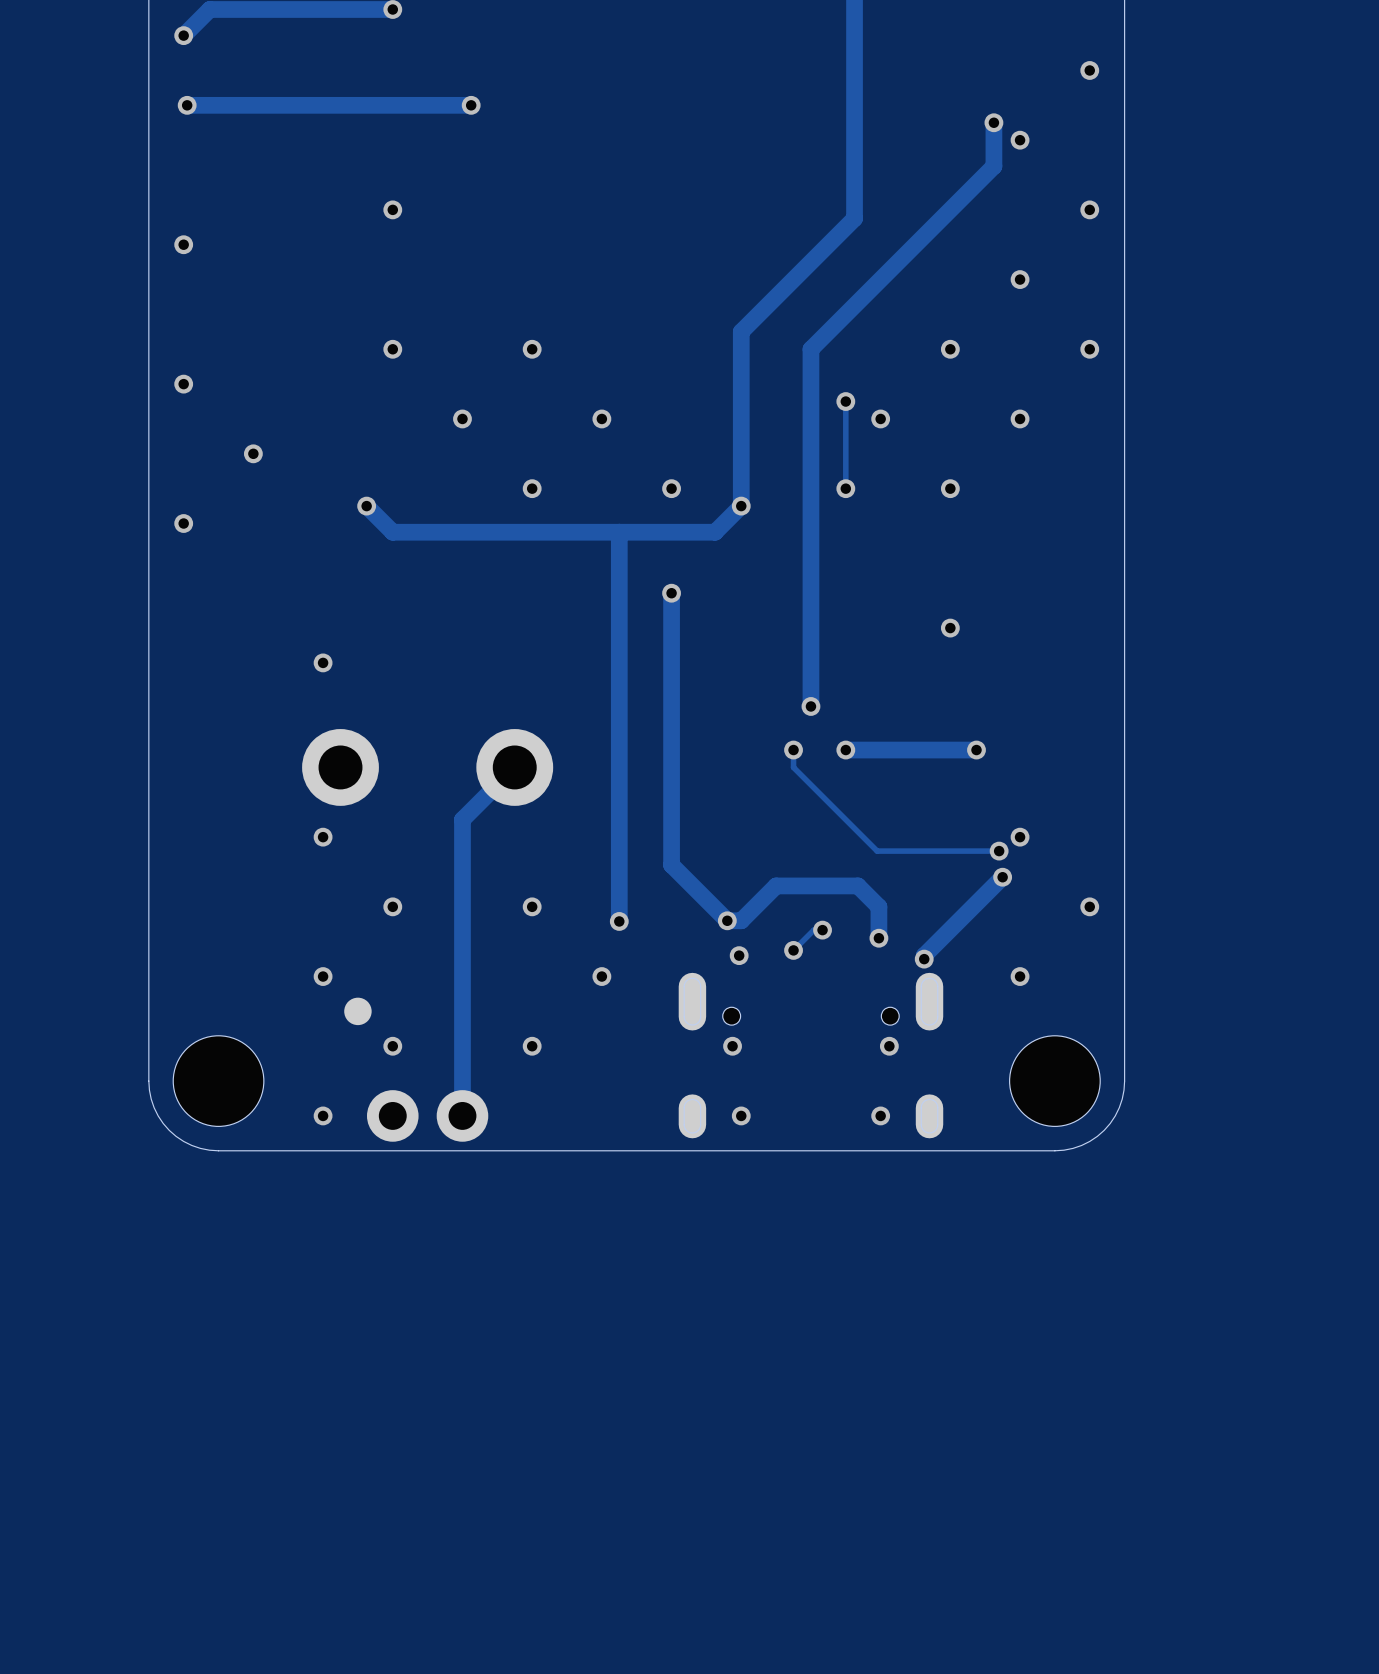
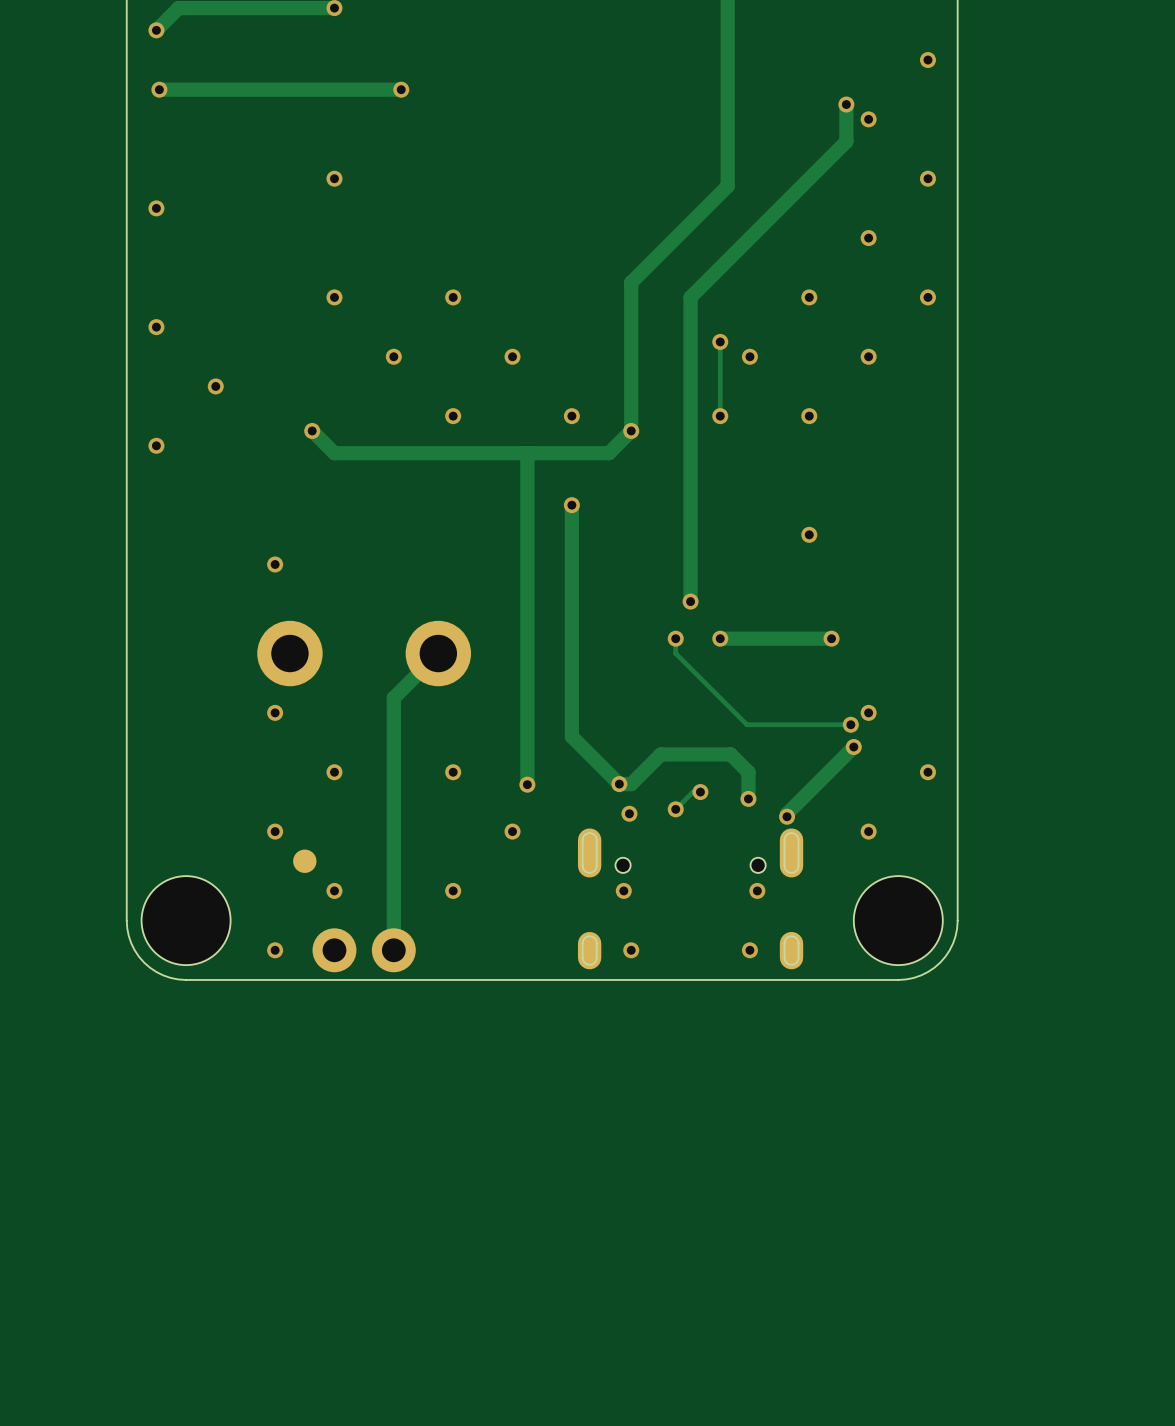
part footprint: [173, 1035, 264, 1127] -> [141, 876, 231, 966]
part footprint: [1009, 1035, 1101, 1127] -> [853, 876, 943, 966]

